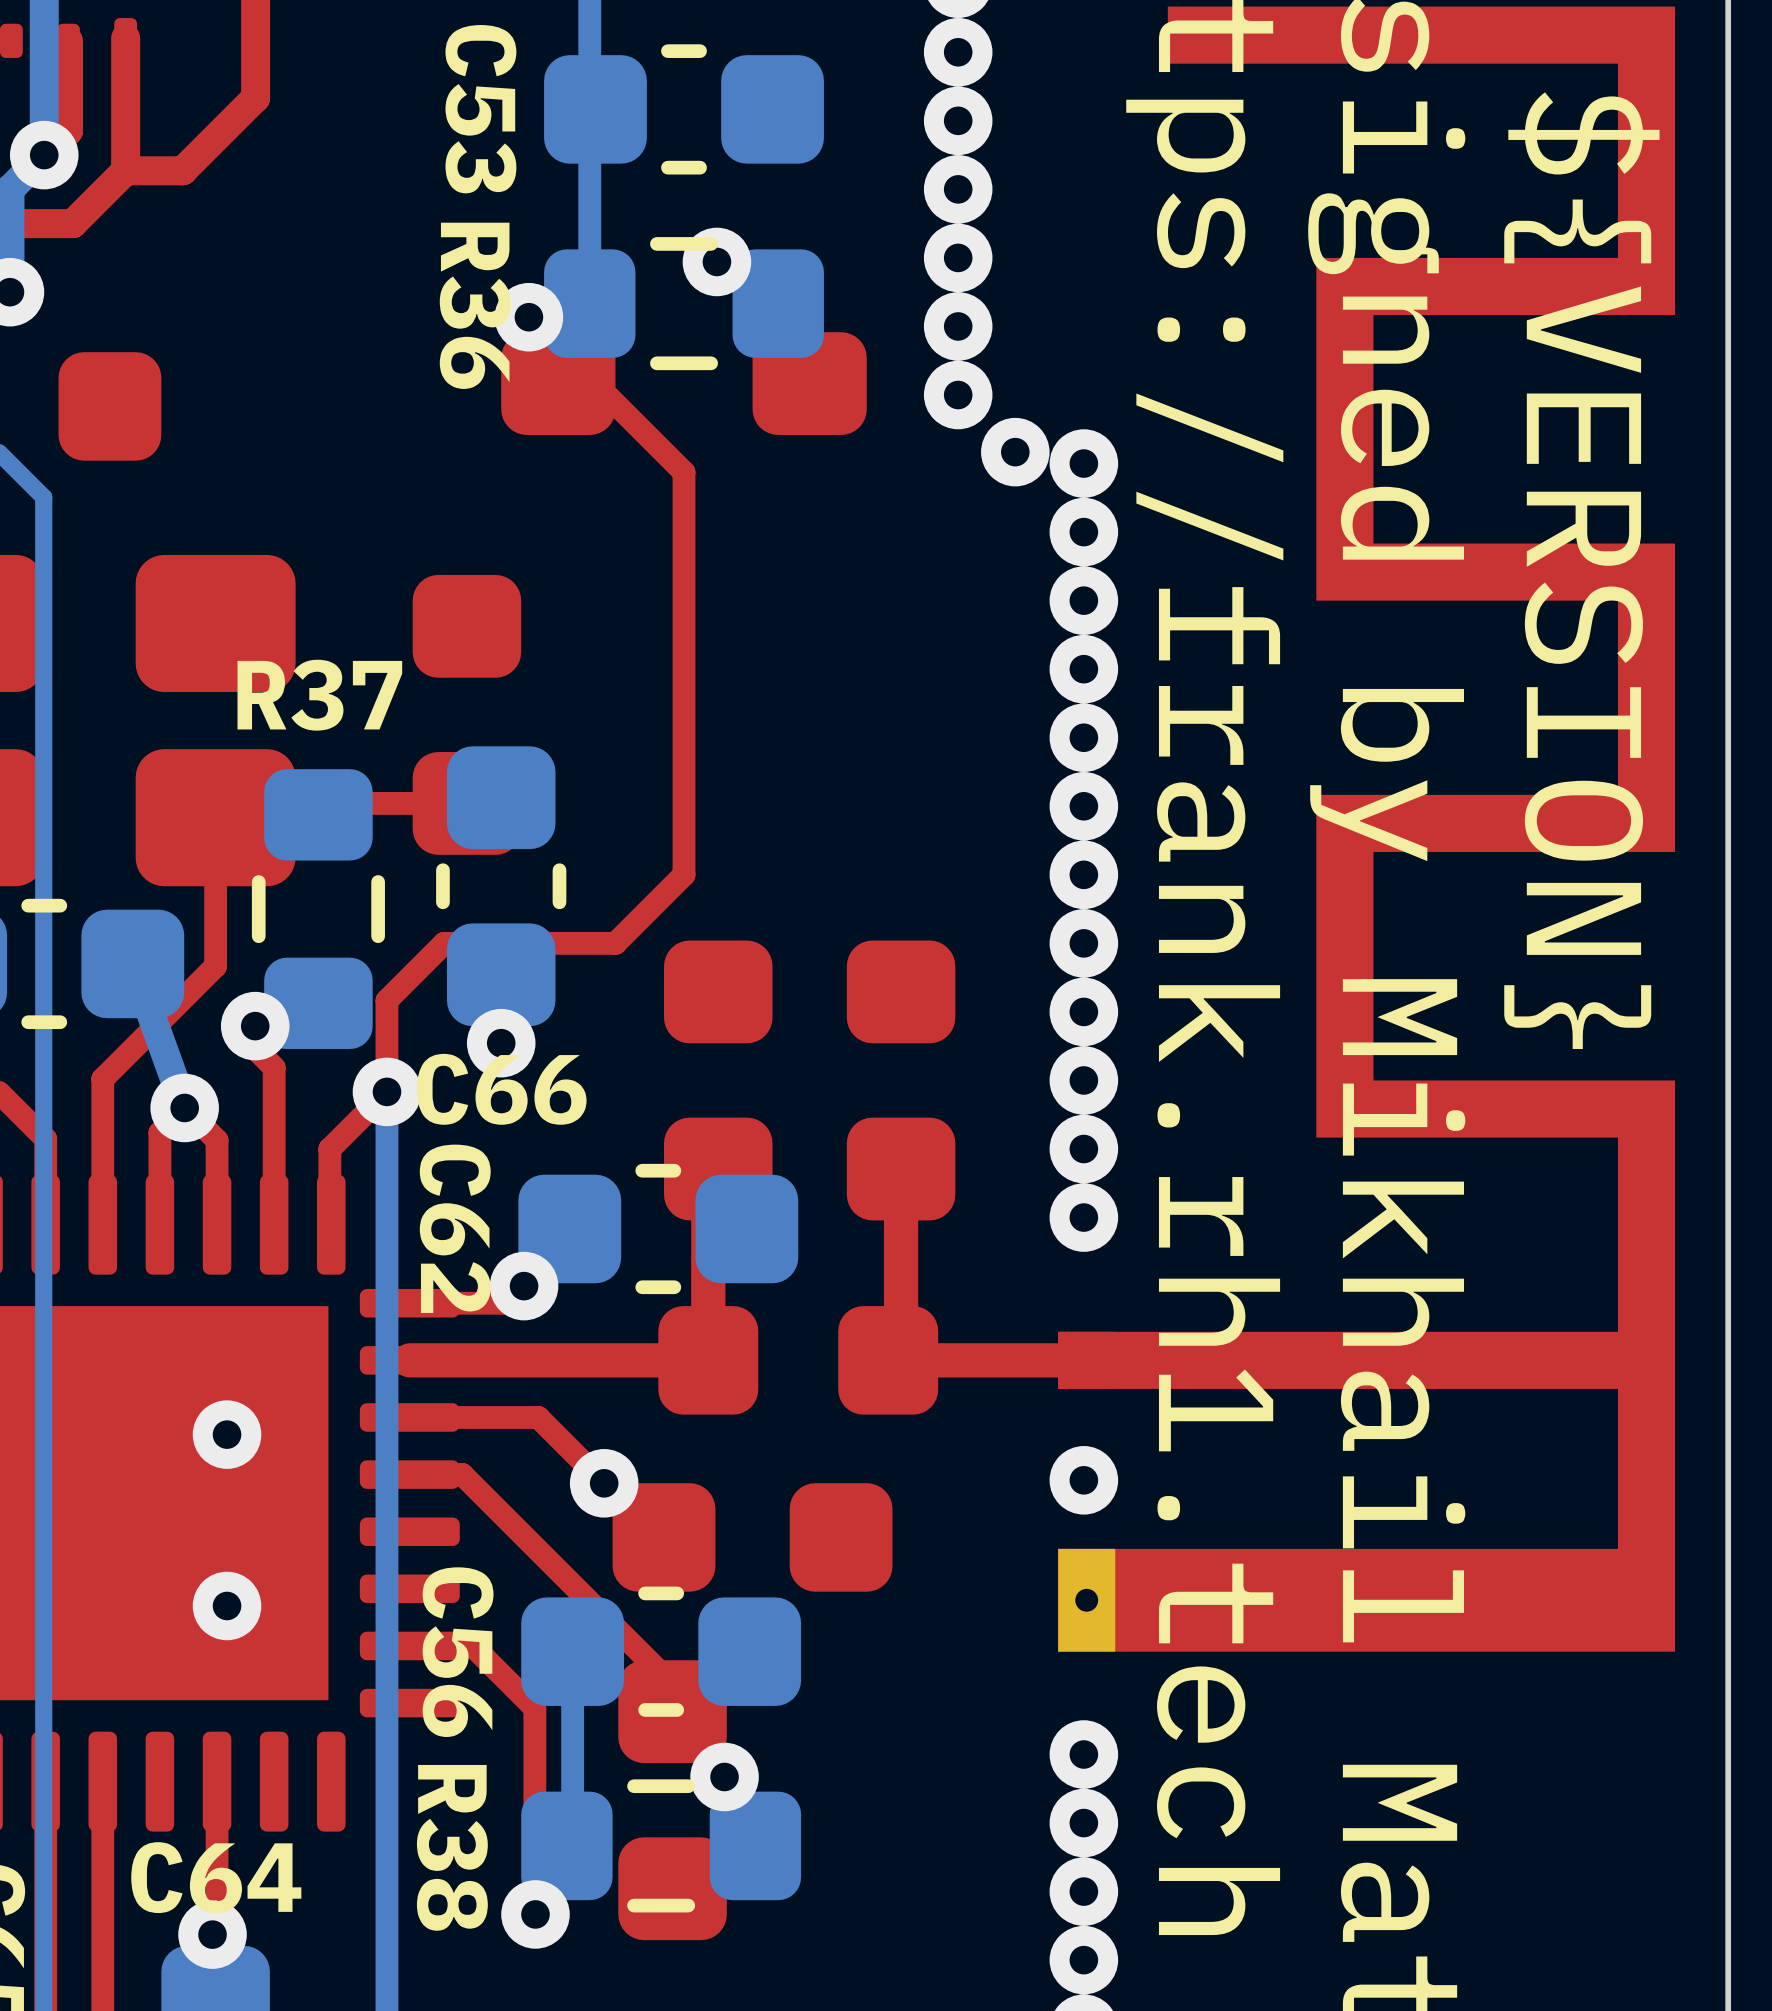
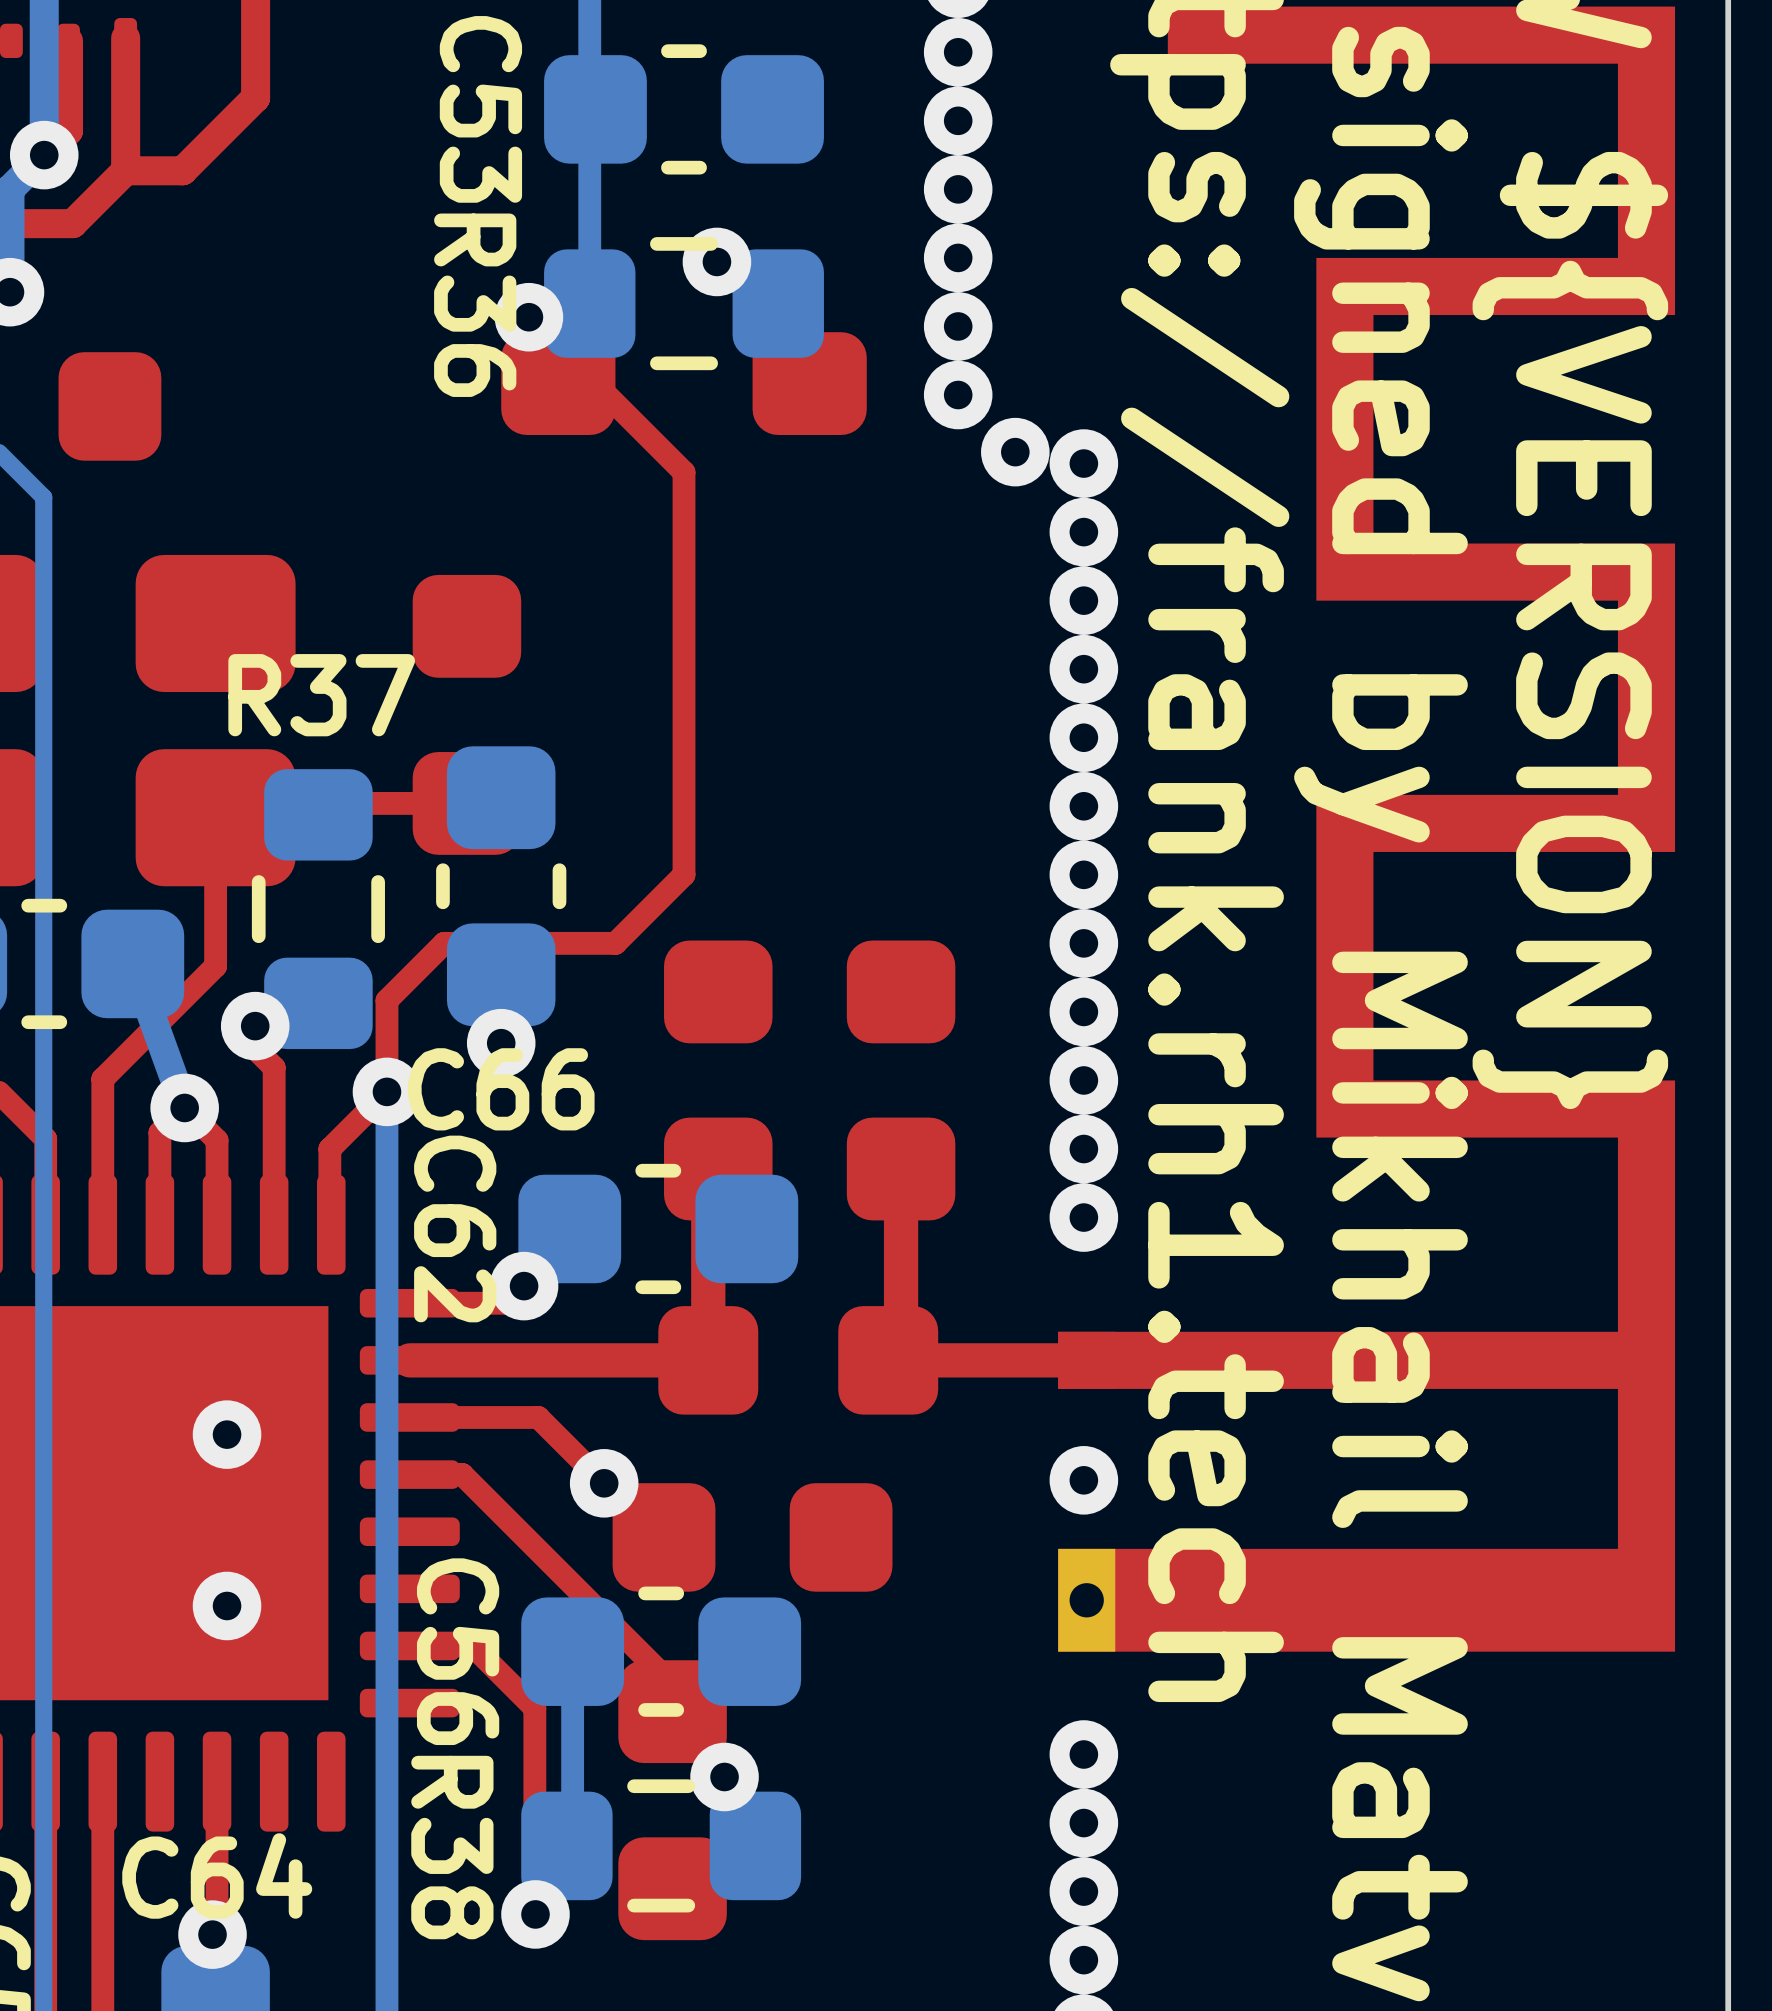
part footprint: [1058, 6, 1676, 1652] -> [1058, 6, 1676, 1652]

